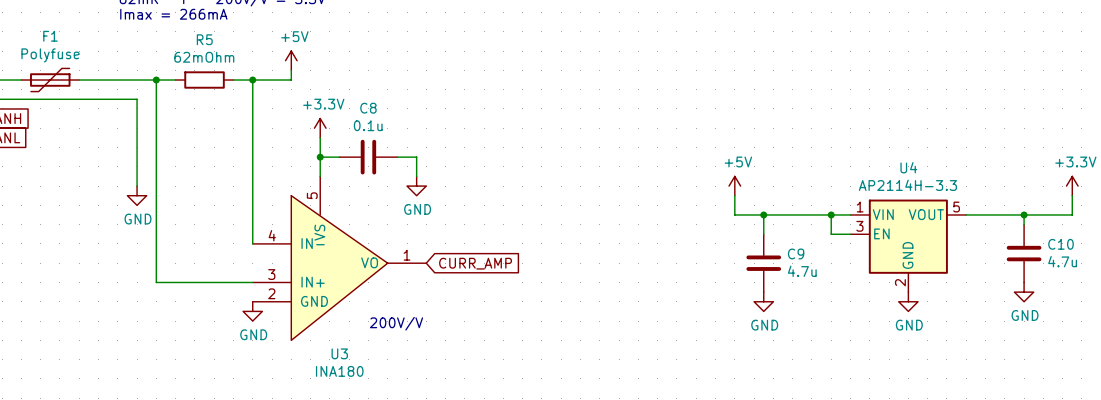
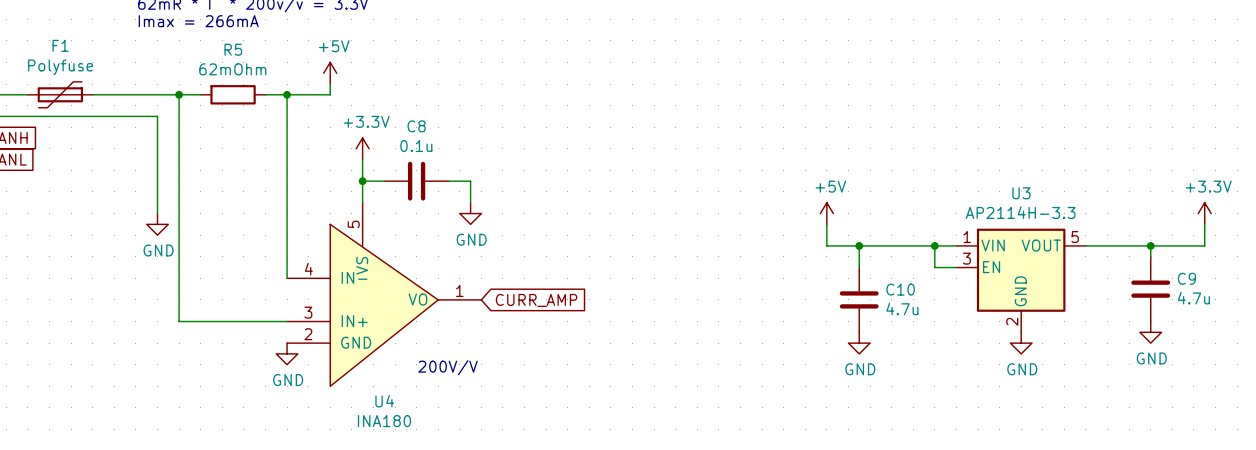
U4 name: U4 (908, 167) -> U3 (1021, 193)
C10 name: C10 (1061, 244) -> C9 (1186, 278)
C9 name: C9 (796, 253) -> C10 (900, 289)
U3 name: U3 (339, 353) -> U4 (384, 401)

